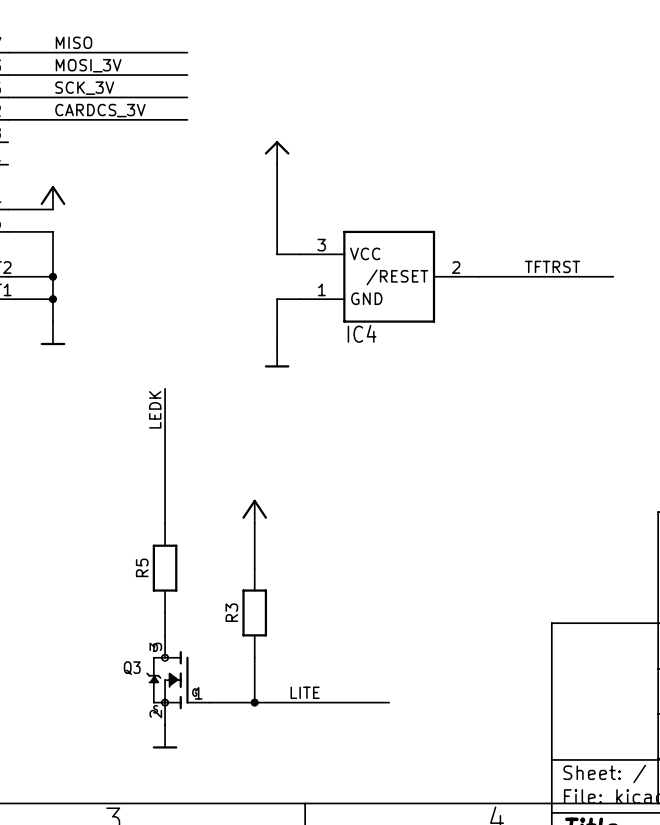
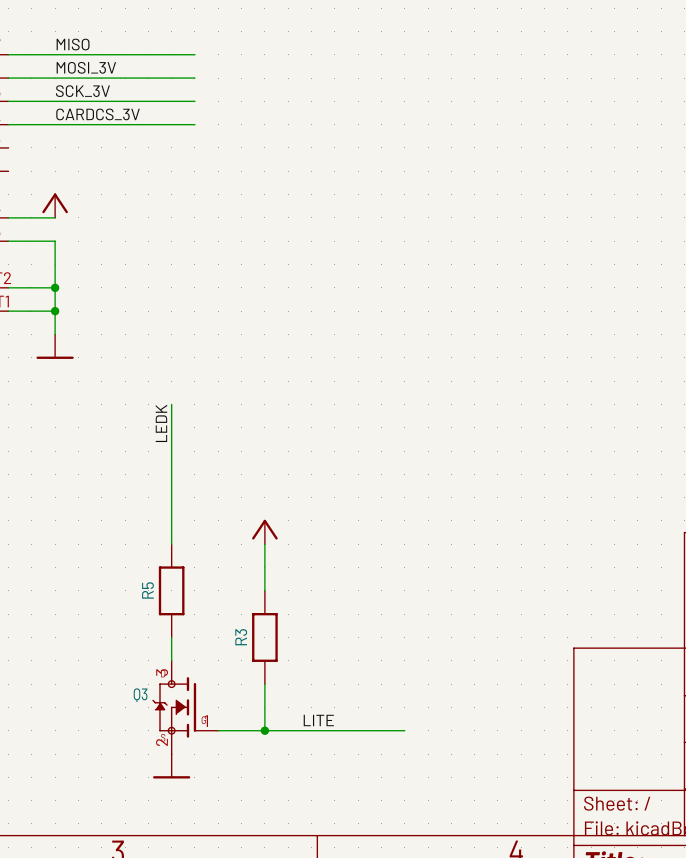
power symbol: (277, 152) -> none
wire: (277, 164) (277, 254) (299, 254) -> none
label: TFTRST (552, 266) -> none
IC4: (389, 276) -> none
wire: (478, 276) (613, 276) -> none
wire: (299, 299) (277, 299) (277, 343) -> none
power symbol shape: [40, 321, 66, 346] -> [36, 334, 74, 359]
power symbol: (277, 355) -> none
power symbol shape: [152, 725, 178, 749] -> [153, 754, 191, 779]

